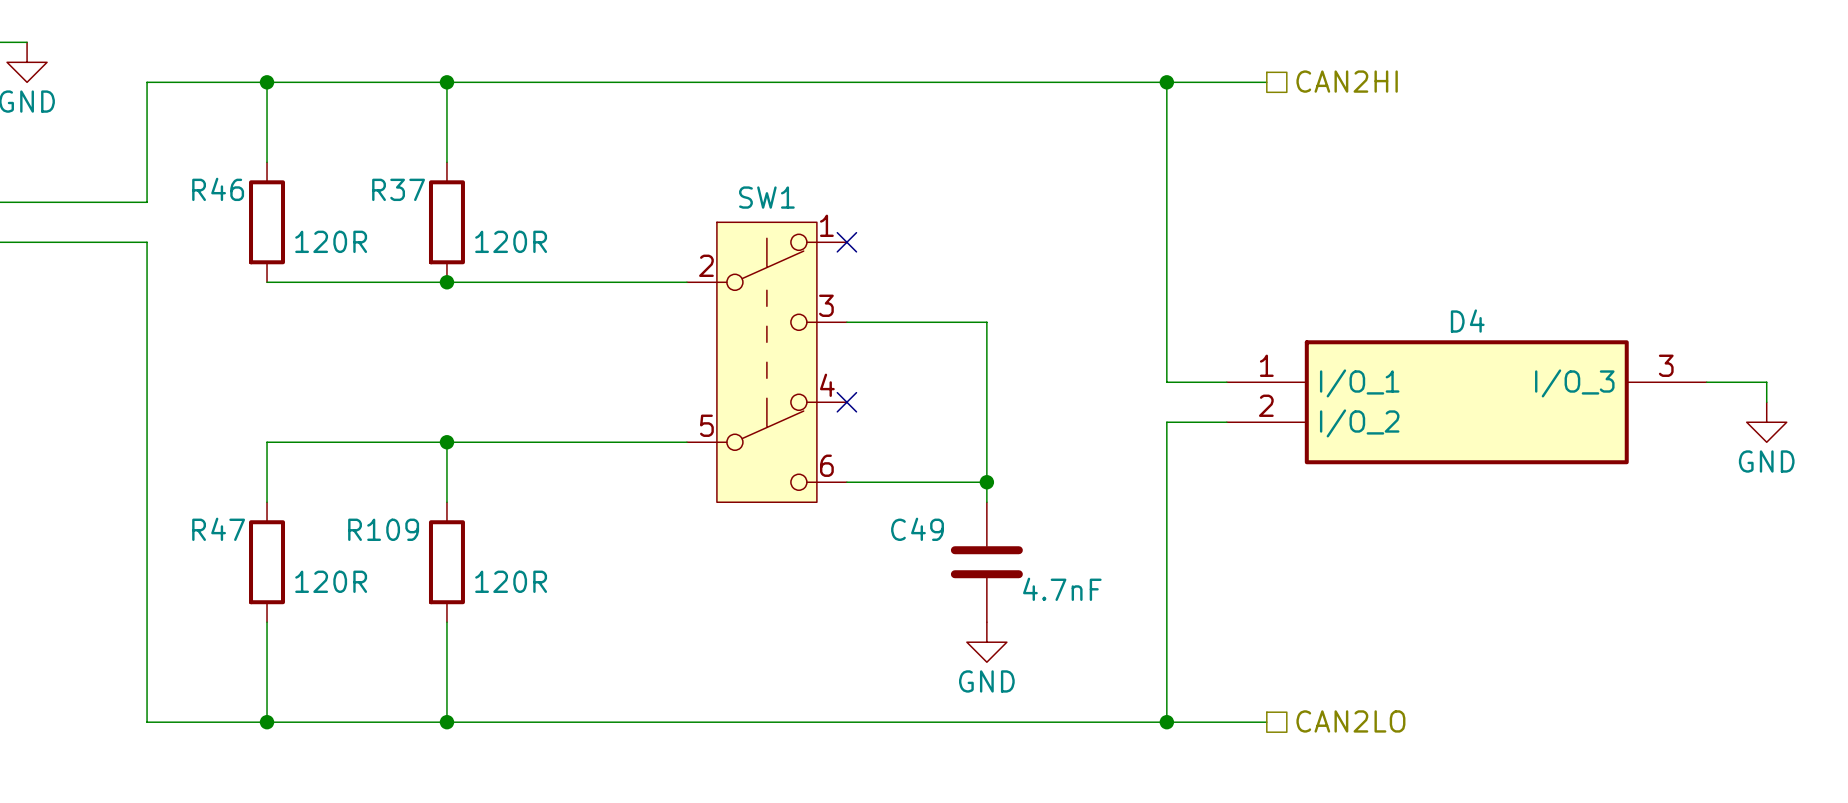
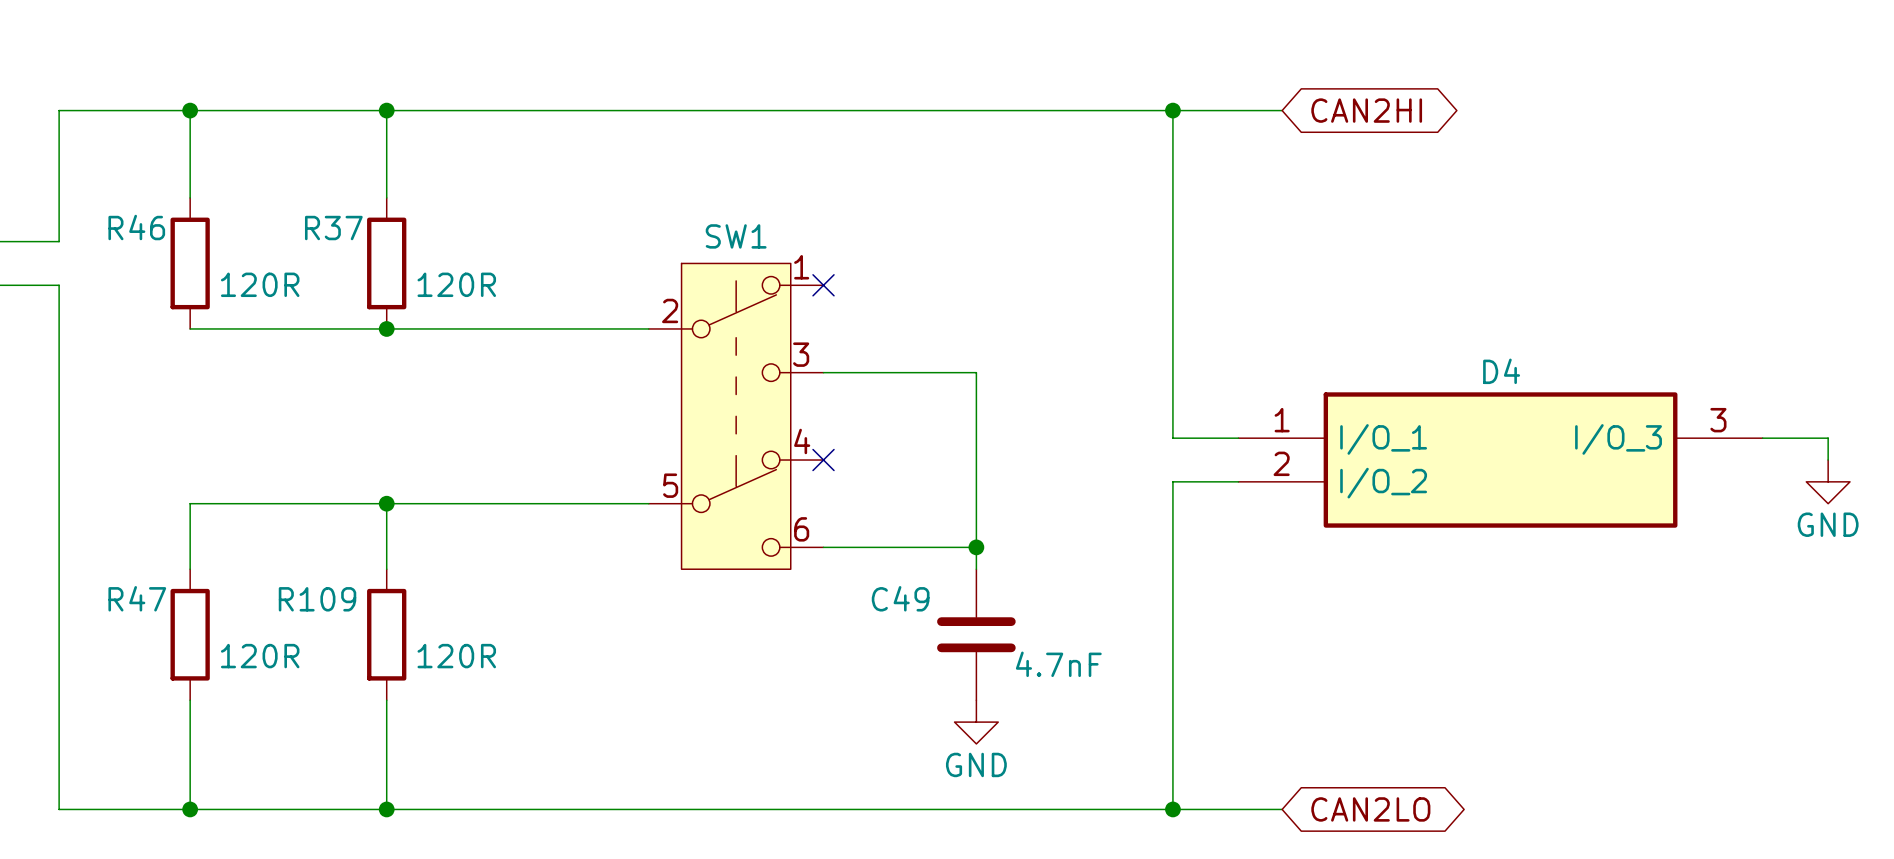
hierarchical label: CAN2HI (1347, 81) -> none
global label: none -> CAN2HI (1366, 110)
hierarchical label: CAN2LO (1350, 721) -> none
global label: none -> CAN2LO (1370, 809)

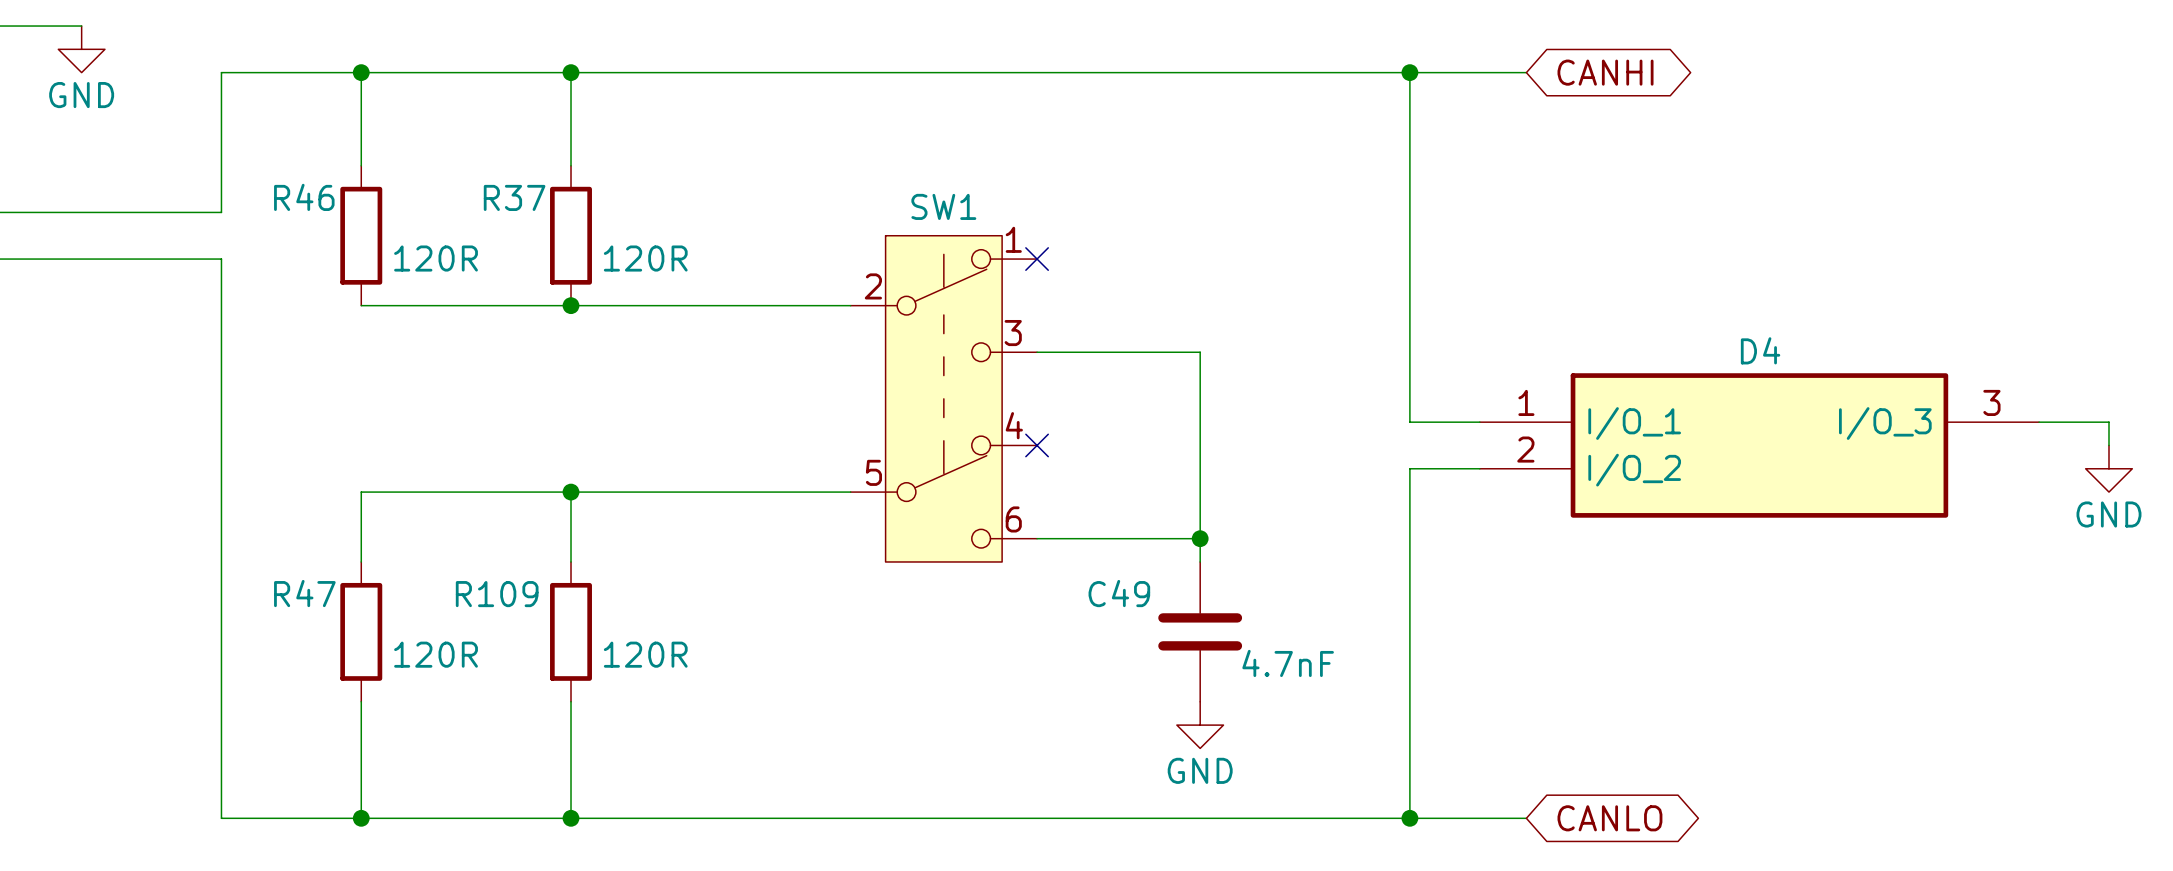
global label: CAN2HI (1366, 110) -> CANHI (1605, 72)
global label: CAN2LO (1370, 809) -> CANLO (1609, 818)

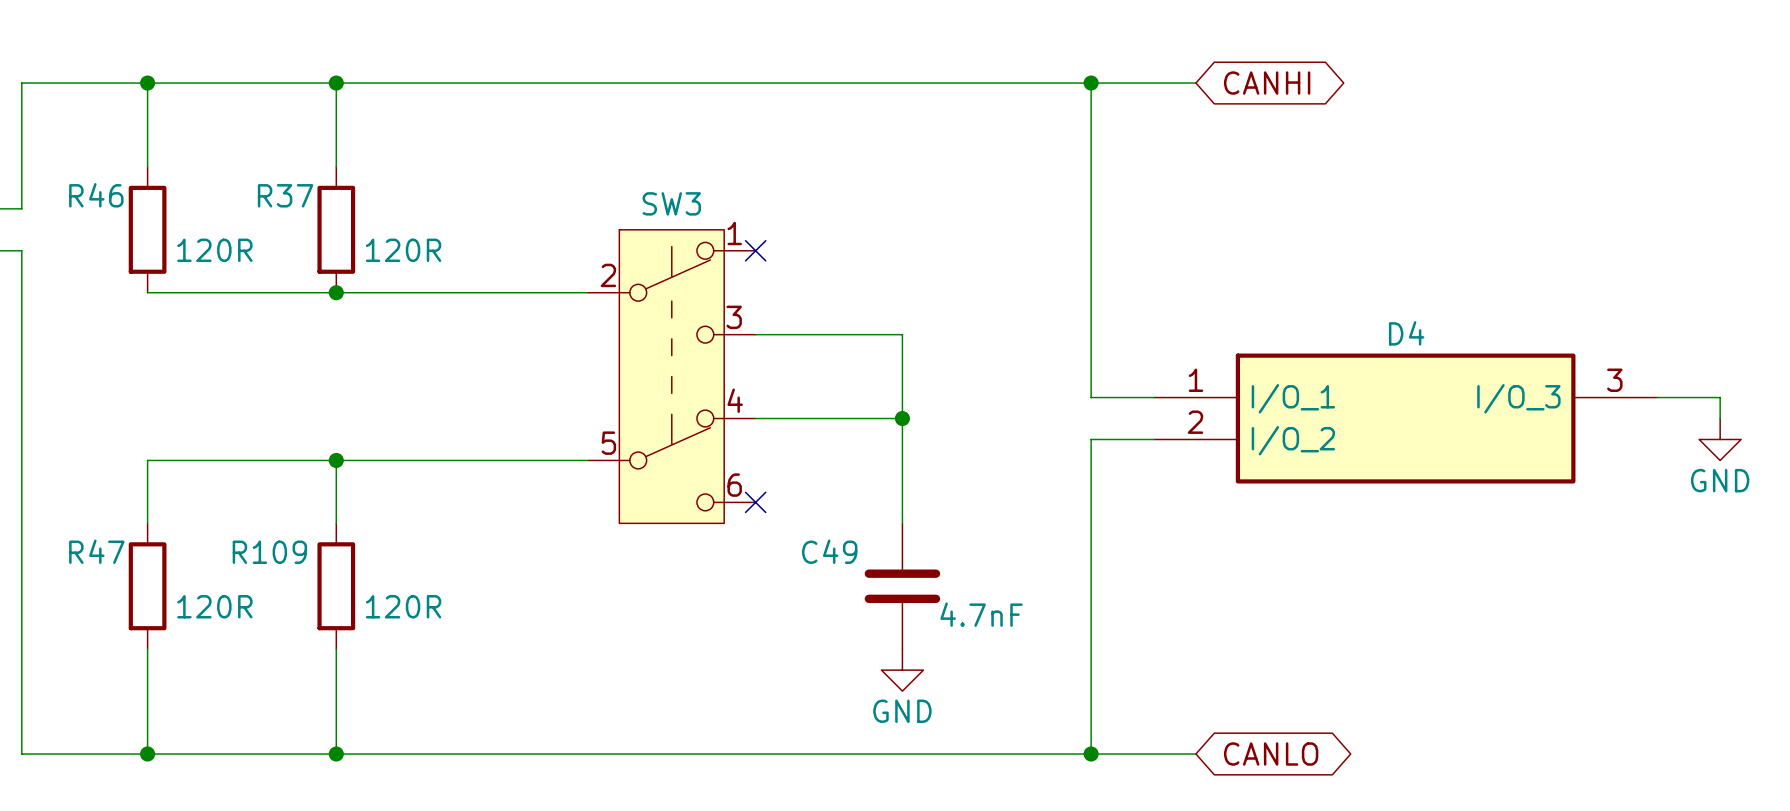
SW1 name: SW1 (943, 206) -> SW3 (671, 203)
no-connect mark position: (1037, 445) -> (755, 502)
wire: (1037, 538) (1200, 538) -> (755, 418) (902, 418)
junction position: (1200, 538) -> (902, 418)

